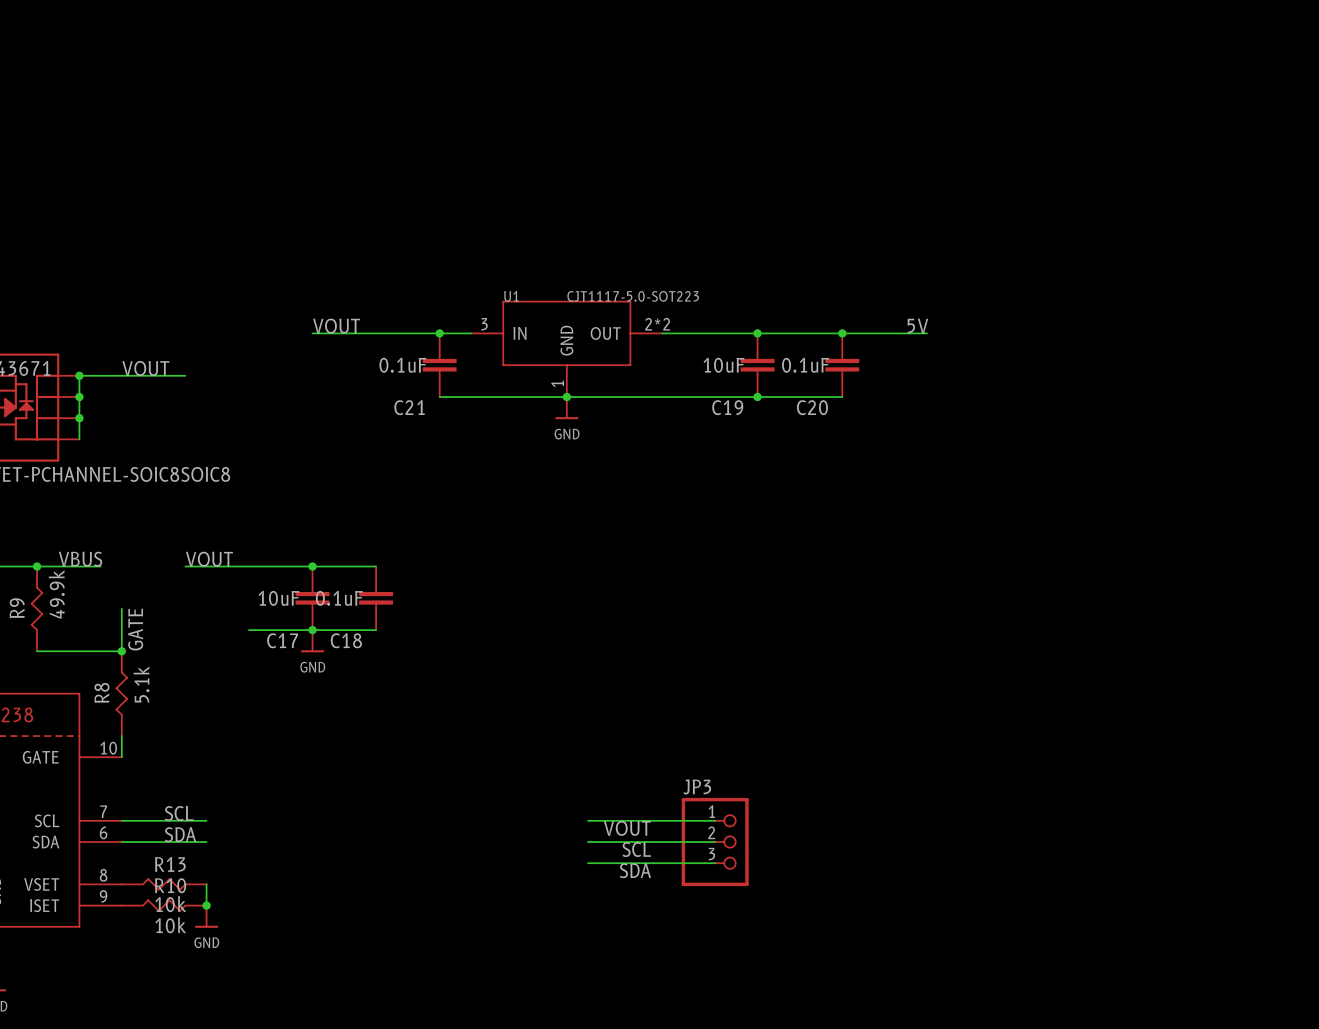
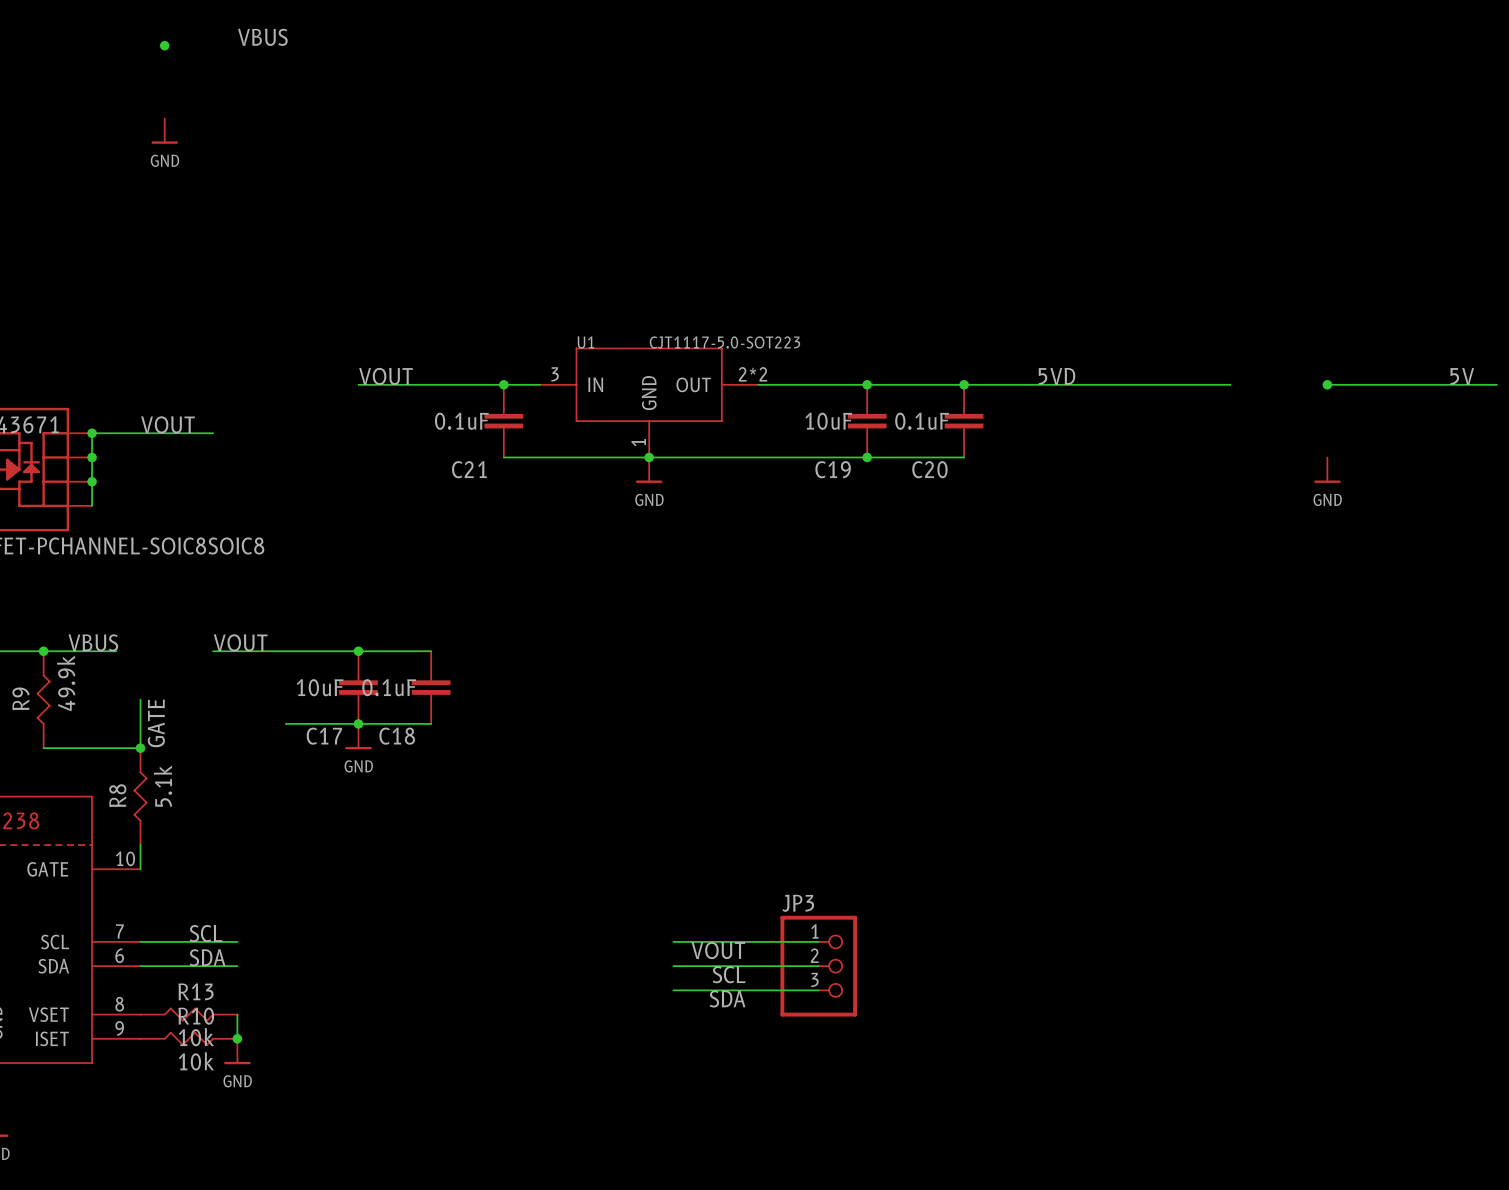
label: none -> VBUS (262, 37)
junction: none -> (164, 45)
power symbol: none -> GND (164, 131)
label: 5V (917, 326) -> 5VD (1057, 376)
label: none -> 5V (1462, 376)
wire: none -> (1060, 384) (1230, 384)
wire: none -> (1327, 384) (1496, 384)
junction: none -> (1327, 384)
power symbol: none -> GND (1327, 470)

